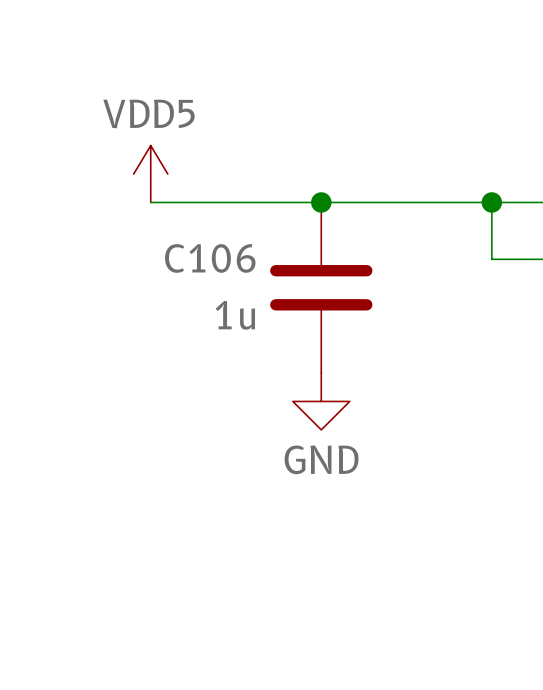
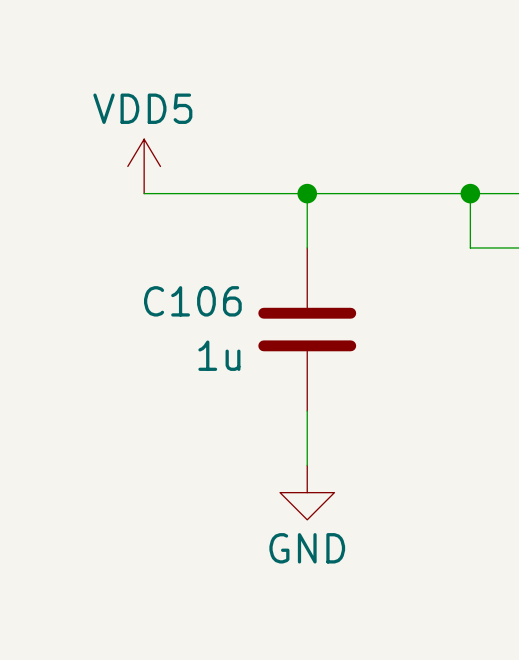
C106 position: (321, 287) -> (307, 329)
power symbol position: GND (321, 401) -> GND (307, 492)
wire: none -> (307, 411) (307, 465)

